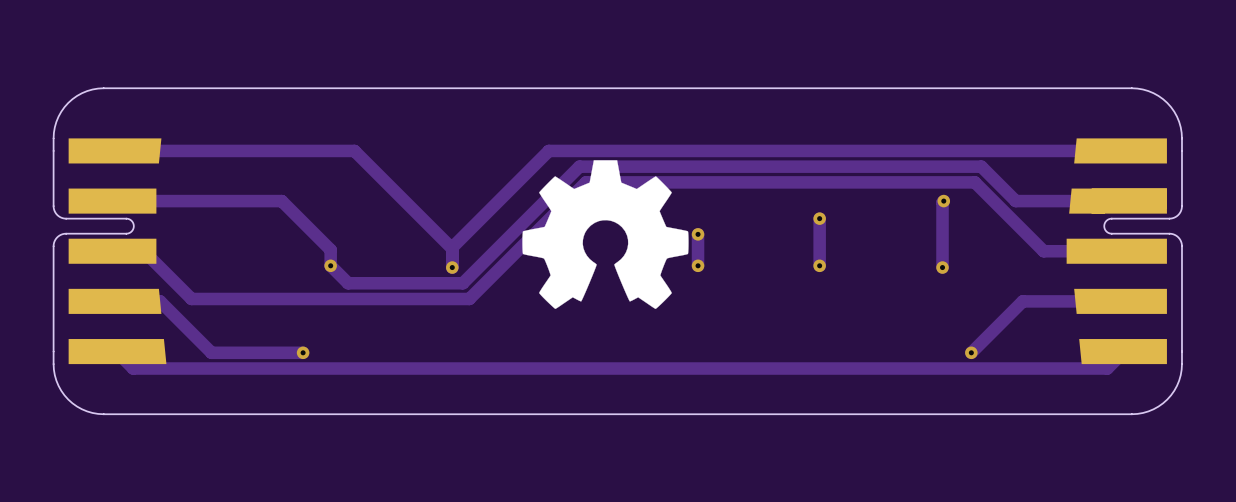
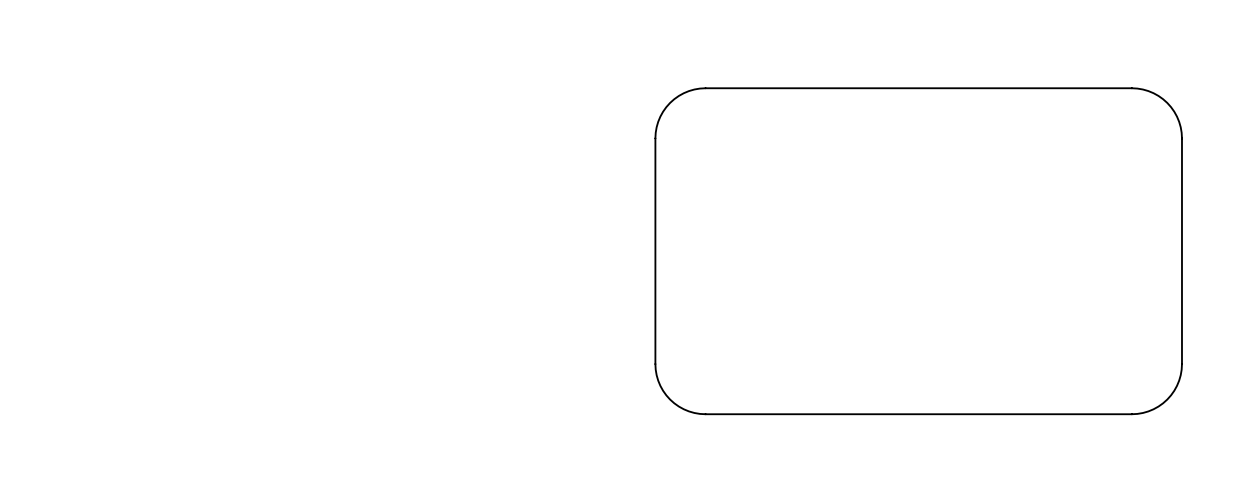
board edge: (705, 88) (98, 88) (77, 95) (64, 107) (54, 127) (53, 150) -> (705, 88) (688, 91) (670, 102) (660, 116) (655, 138) (656, 375) (663, 390) (674, 403) (688, 411) (705, 414)
track: (113, 150) (354, 150) (452, 248) -> none
track: (1121, 150) (548, 150) (452, 247) (452, 267) -> none
board edge: none -> (1181, 150) (1181, 351)
drawing: [522, 160, 689, 309] -> none
track: (943, 201) (942, 267) -> none
via: (943, 201) -> none
track: (1129, 201) (1015, 201) (981, 166) (579, 166) (462, 283) (348, 283) (330, 265) (330, 249) (281, 201) (112, 201) -> none
track: (819, 218) (819, 265) -> none
via: (819, 218) -> none
track: (698, 234) (698, 265) -> none
via: (698, 234) -> none
part: (109, 251) -> none
track: (1116, 251) (1043, 251) (974, 182) (586, 182) (469, 298) (191, 298) (143, 251) (112, 251) -> none
part: (1124, 251) -> none
via: (330, 265) -> none
via: (698, 265) -> none
via: (819, 265) -> none
via: (452, 267) -> none
via: (942, 267) -> none
track: (113, 301) (160, 301) (211, 352) (303, 352) -> none
track: (1121, 301) (1022, 301) (971, 352) -> none
board edge: (53, 351) (54, 375) (64, 395) (77, 406) (98, 413) (705, 414) -> none
track: (1124, 351) (1107, 368) (133, 368) (116, 351) -> none
via: (303, 352) -> none
via: (971, 352) -> none

